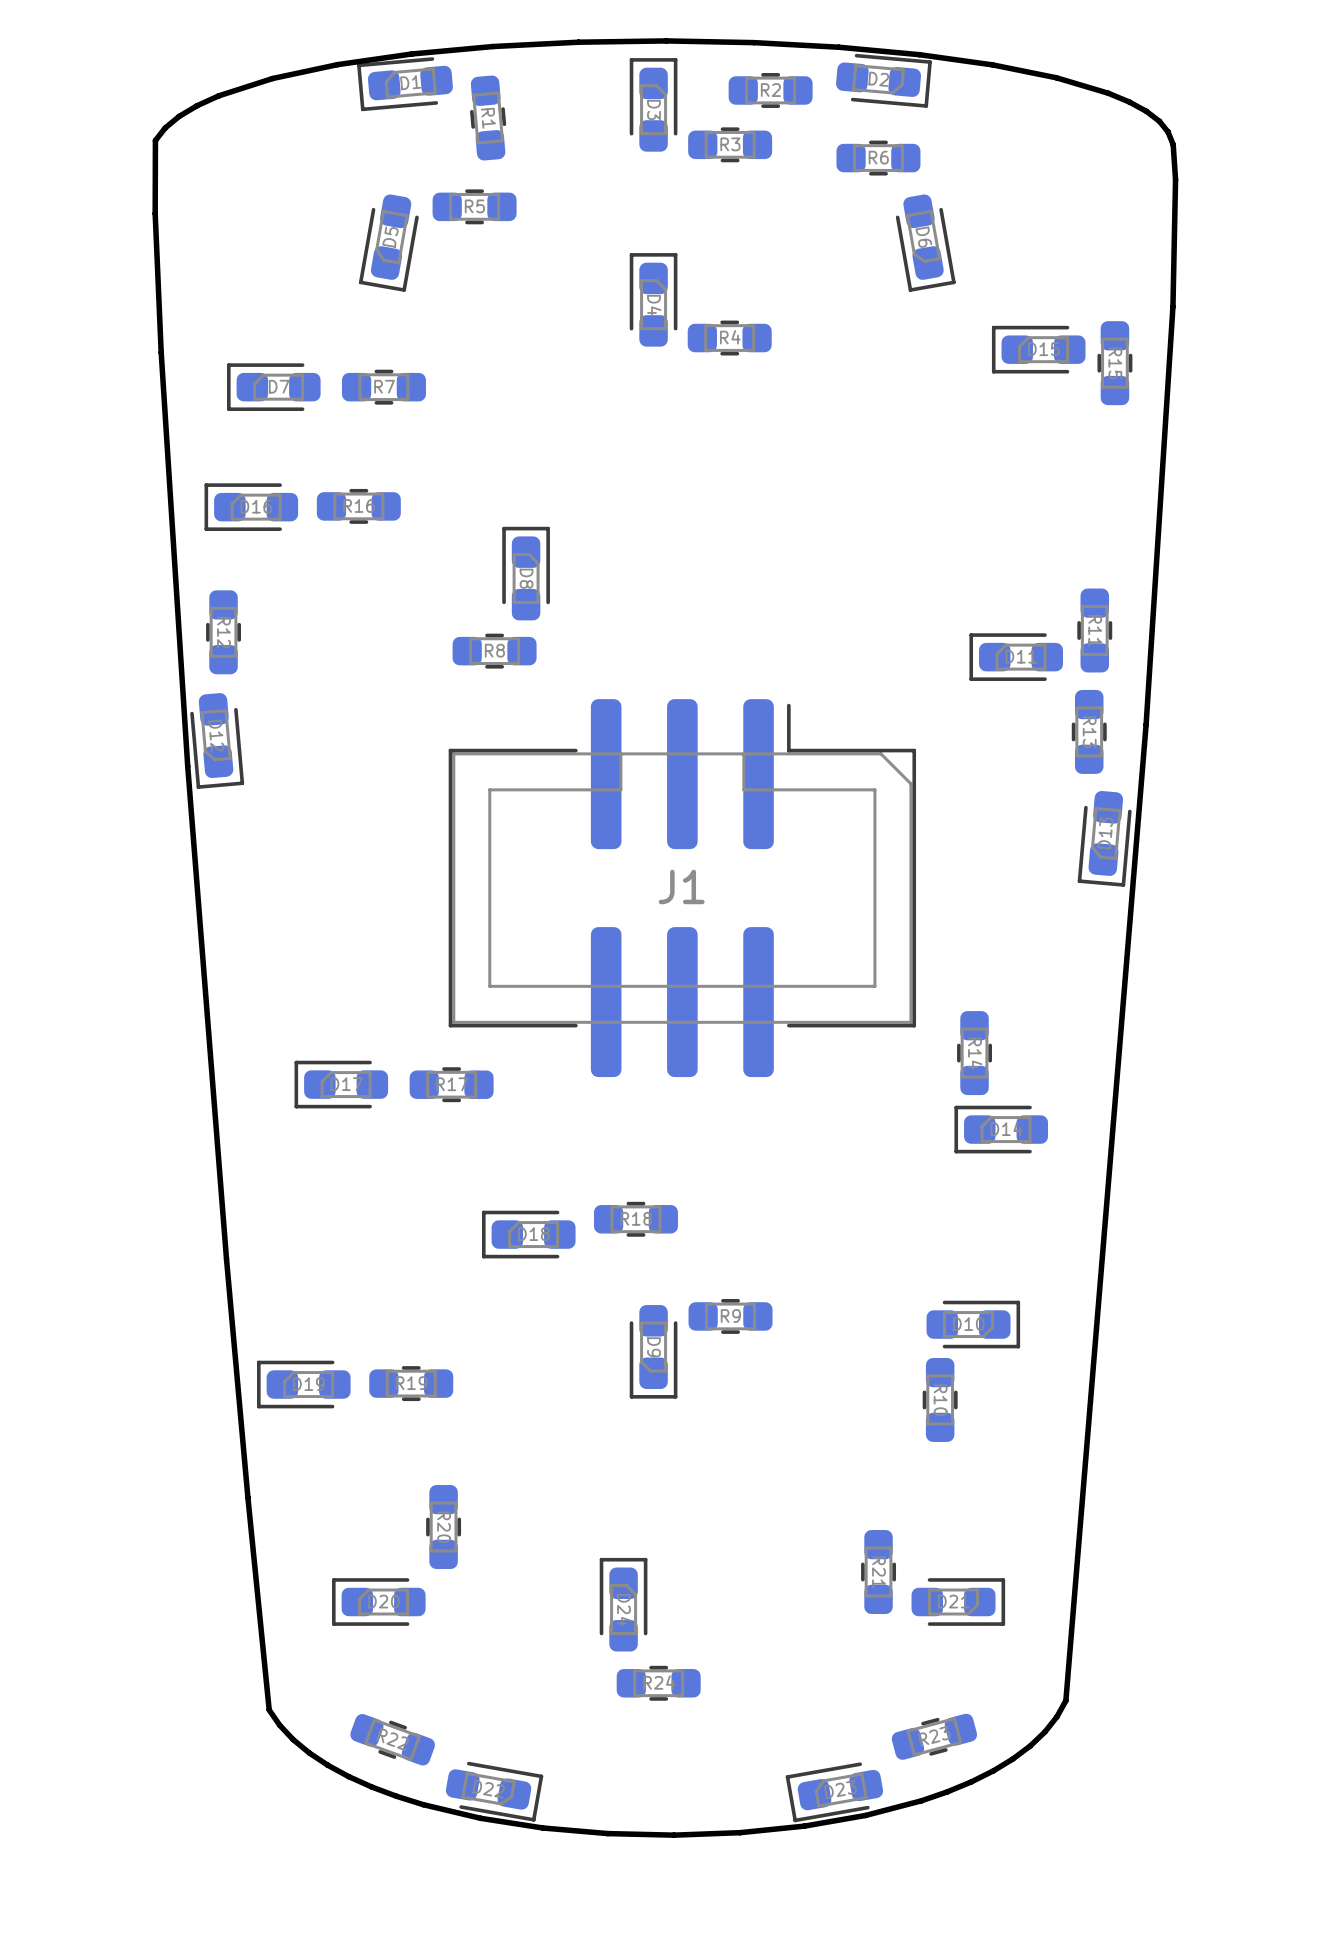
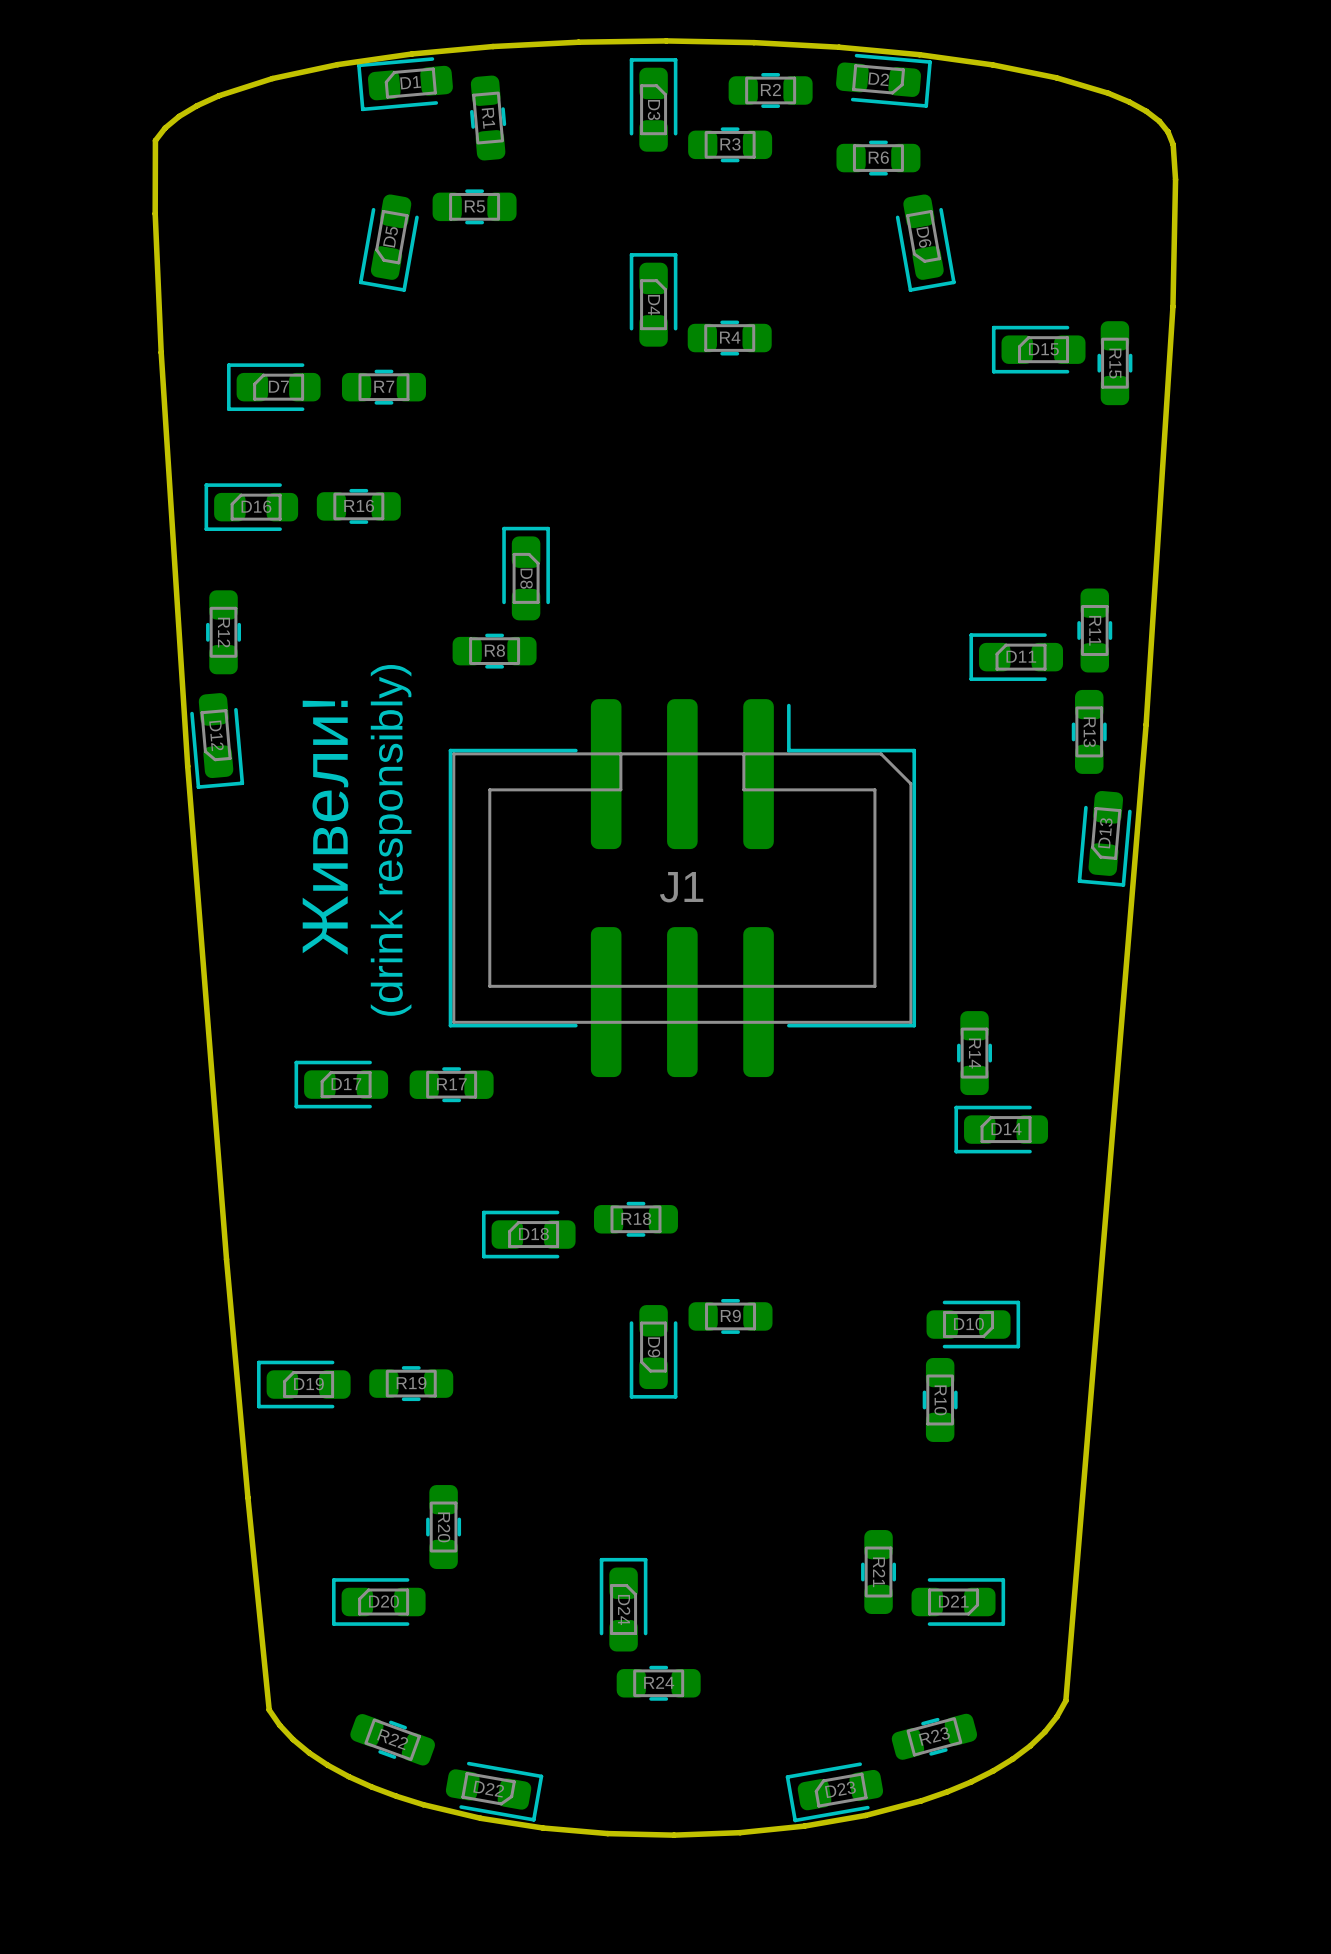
text: none -> (drink responsibly) (391, 840)
text: none -> Живели! (325, 827)

